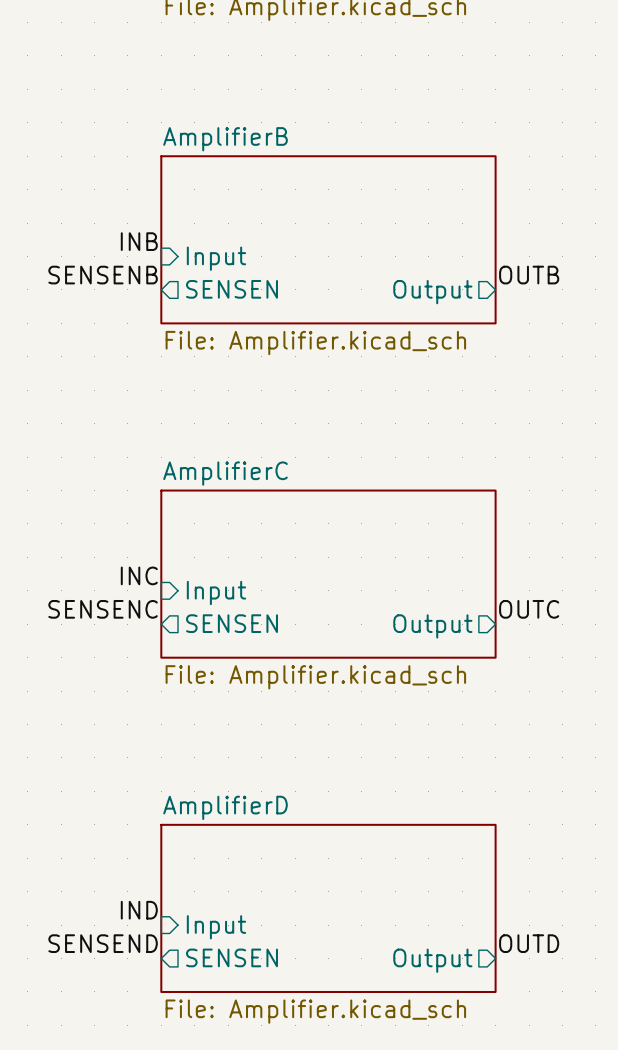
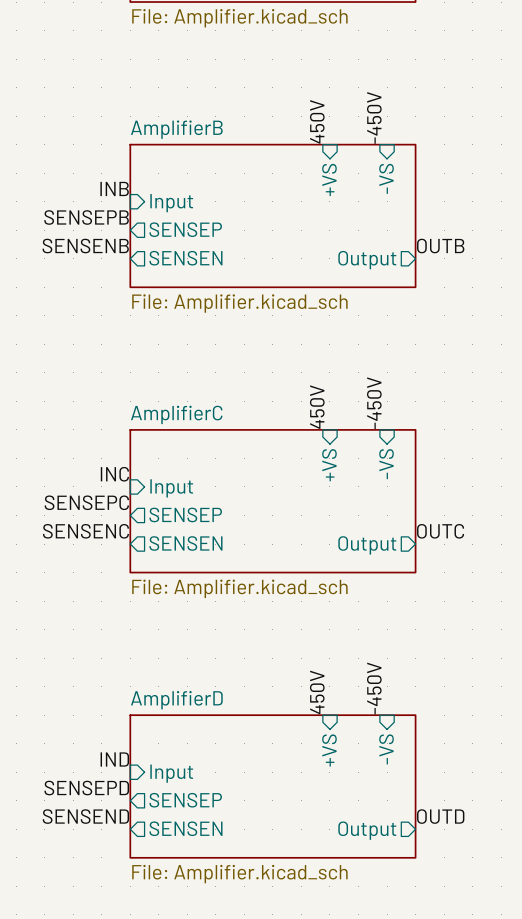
label: none -> -450V (374, 117)
label: none -> 450V (317, 121)
sheet pin: none -> +VS (329, 179)
sheet pin: none -> -VS (386, 178)
label: none -> INB (114, 188)
sheet pin: none -> Input (171, 203)
label: INB (139, 241) -> SENSEPB (86, 217)
sheet pin shape: input (216, 258) -> output (185, 229)
sheet pin: Input (216, 258) -> SENSEP (185, 229)
label: none -> -450V (374, 403)
label: none -> 450V (317, 407)
sheet pin: none -> +VS (329, 465)
sheet pin: none -> -VS (386, 464)
label: none -> INC (114, 474)
sheet pin: none -> Input (171, 488)
label: INC (139, 575) -> SENSEPC (86, 502)
sheet pin shape: input (216, 592) -> output (185, 514)
sheet pin: Input (216, 592) -> SENSEP (185, 514)
label: none -> -450V (374, 688)
label: none -> 450V (317, 692)
sheet pin: none -> +VS (329, 750)
sheet pin: none -> -VS (386, 749)
label: none -> IND (114, 759)
sheet pin: none -> Input (171, 773)
label: IND (139, 910) -> SENSEPD (86, 788)
sheet pin shape: input (216, 927) -> output (185, 800)
sheet pin: Input (216, 927) -> SENSEP (185, 800)

